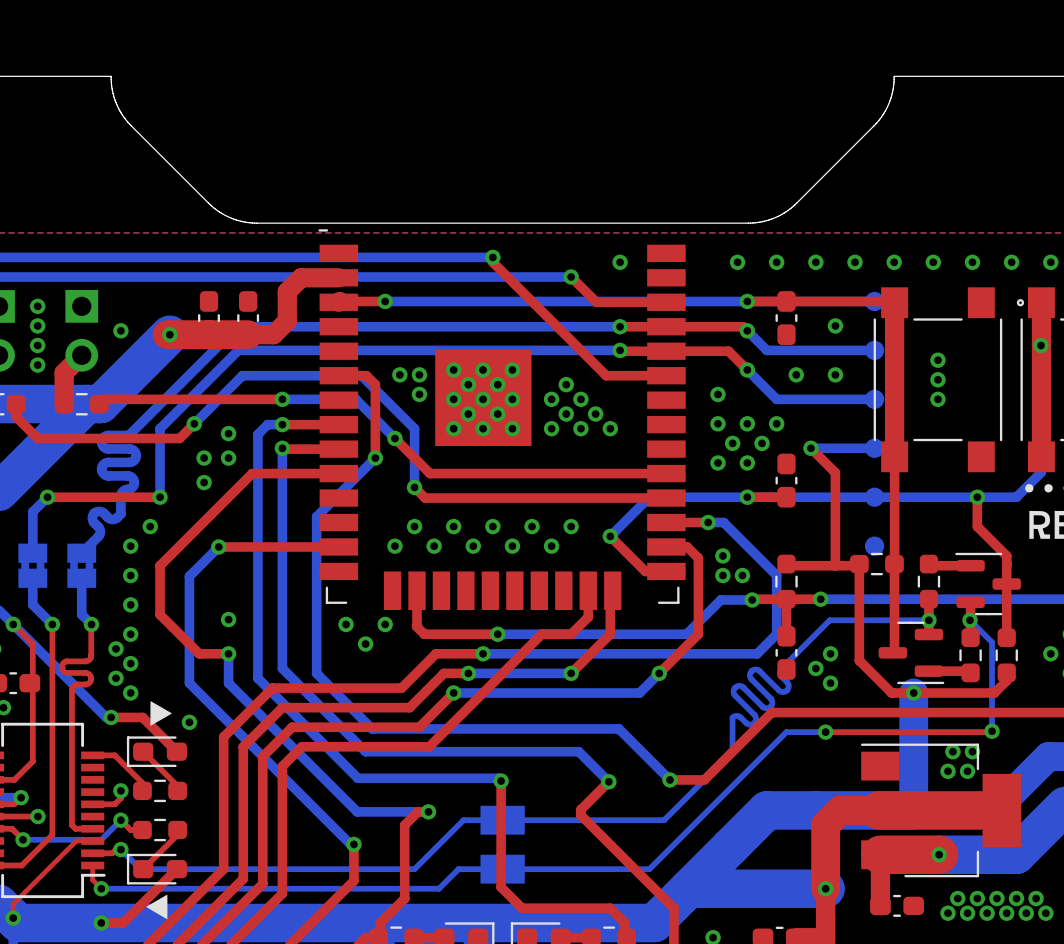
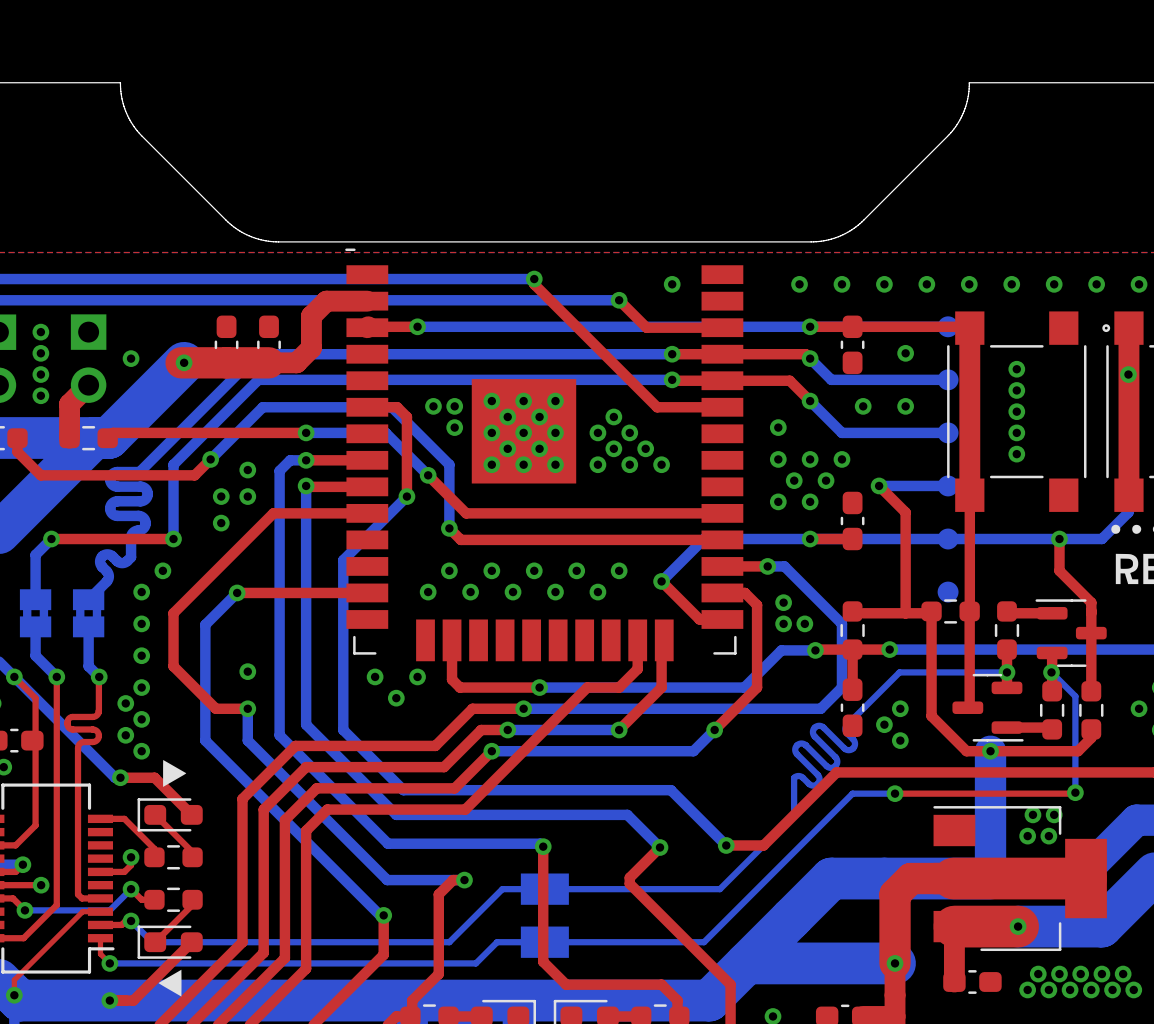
via: none -> (1016, 369)
via: none -> (1016, 454)
via: (189, 722) -> none

